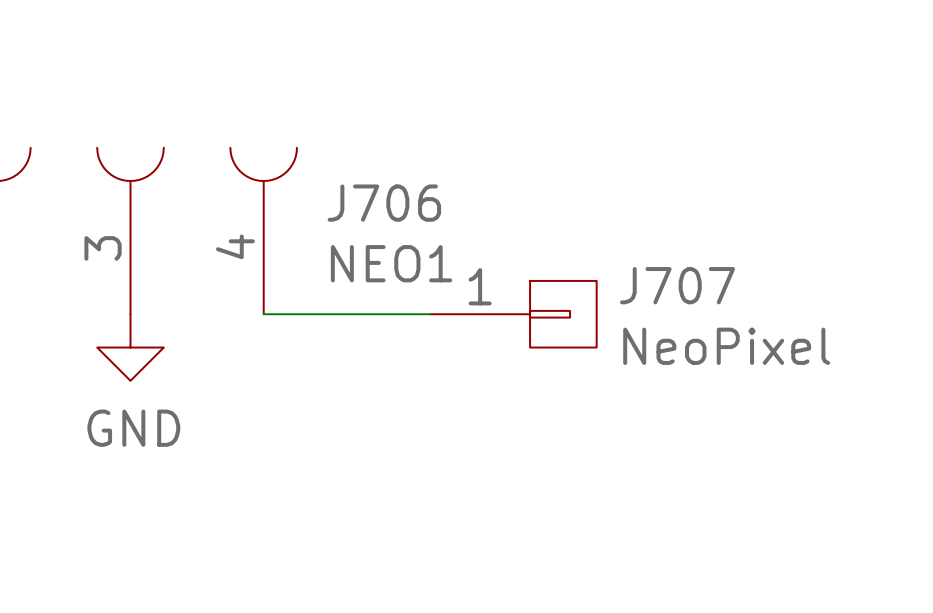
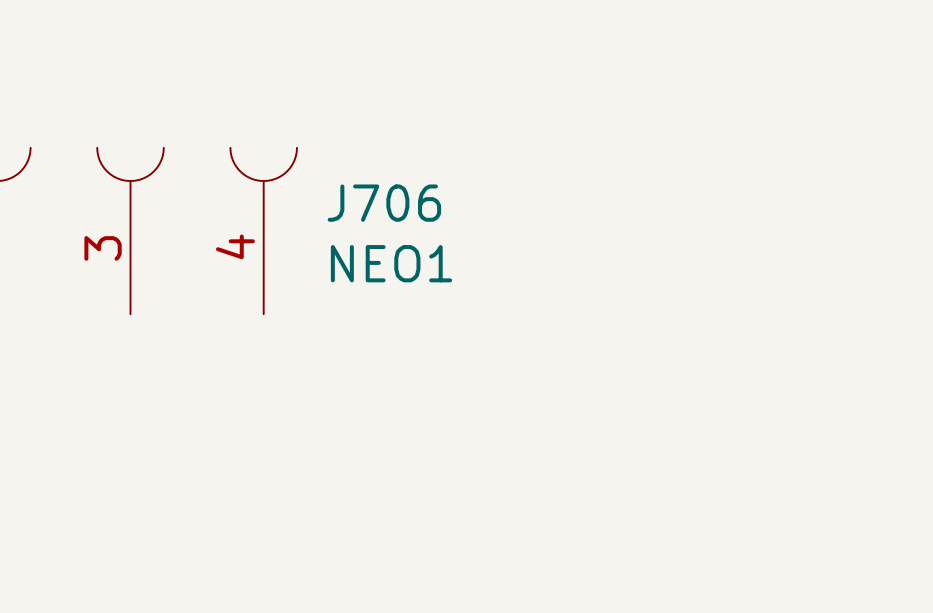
wire: (263, 314) (430, 314) -> none
J707: NeoPixel (513, 314) -> none
power symbol: GND (130, 347) -> none

